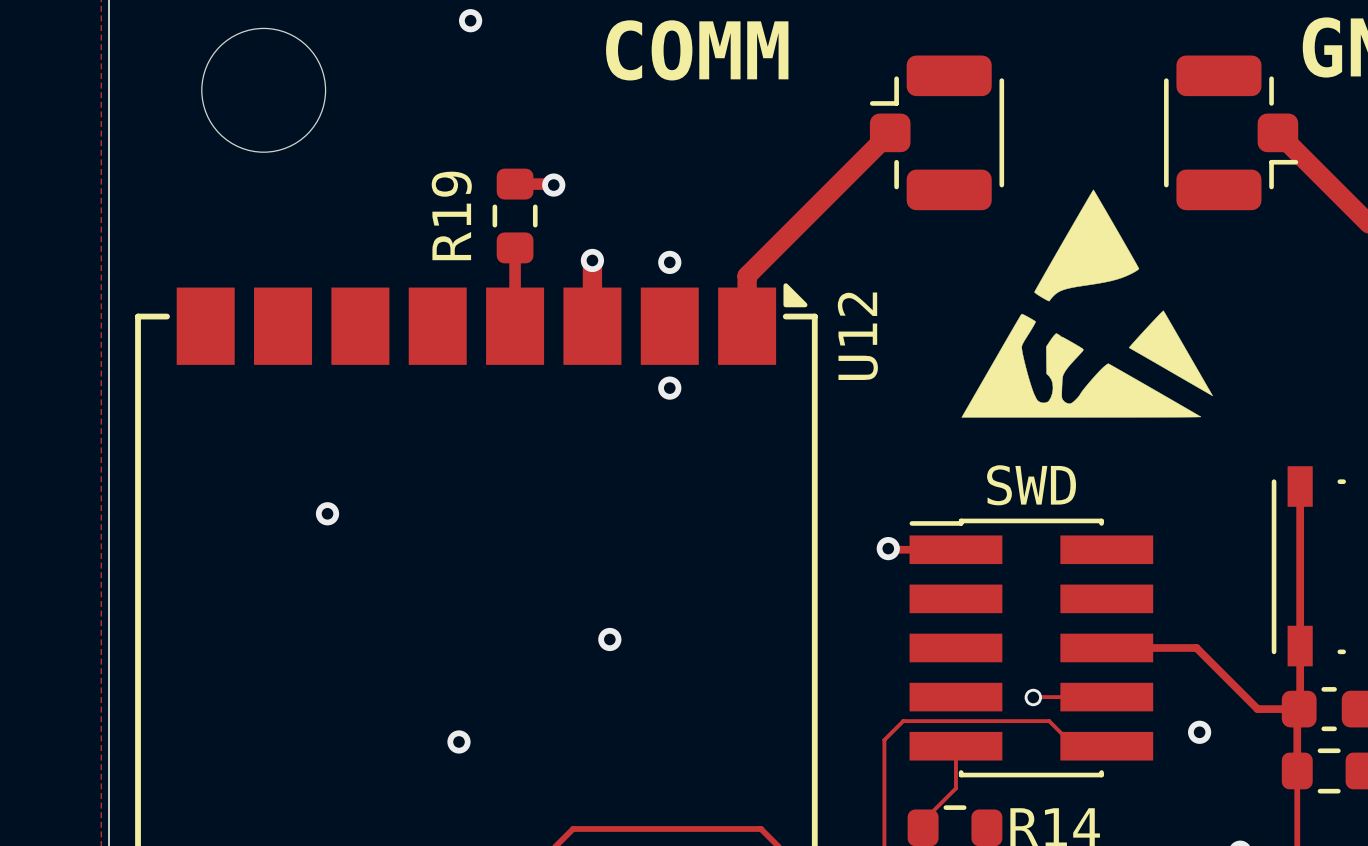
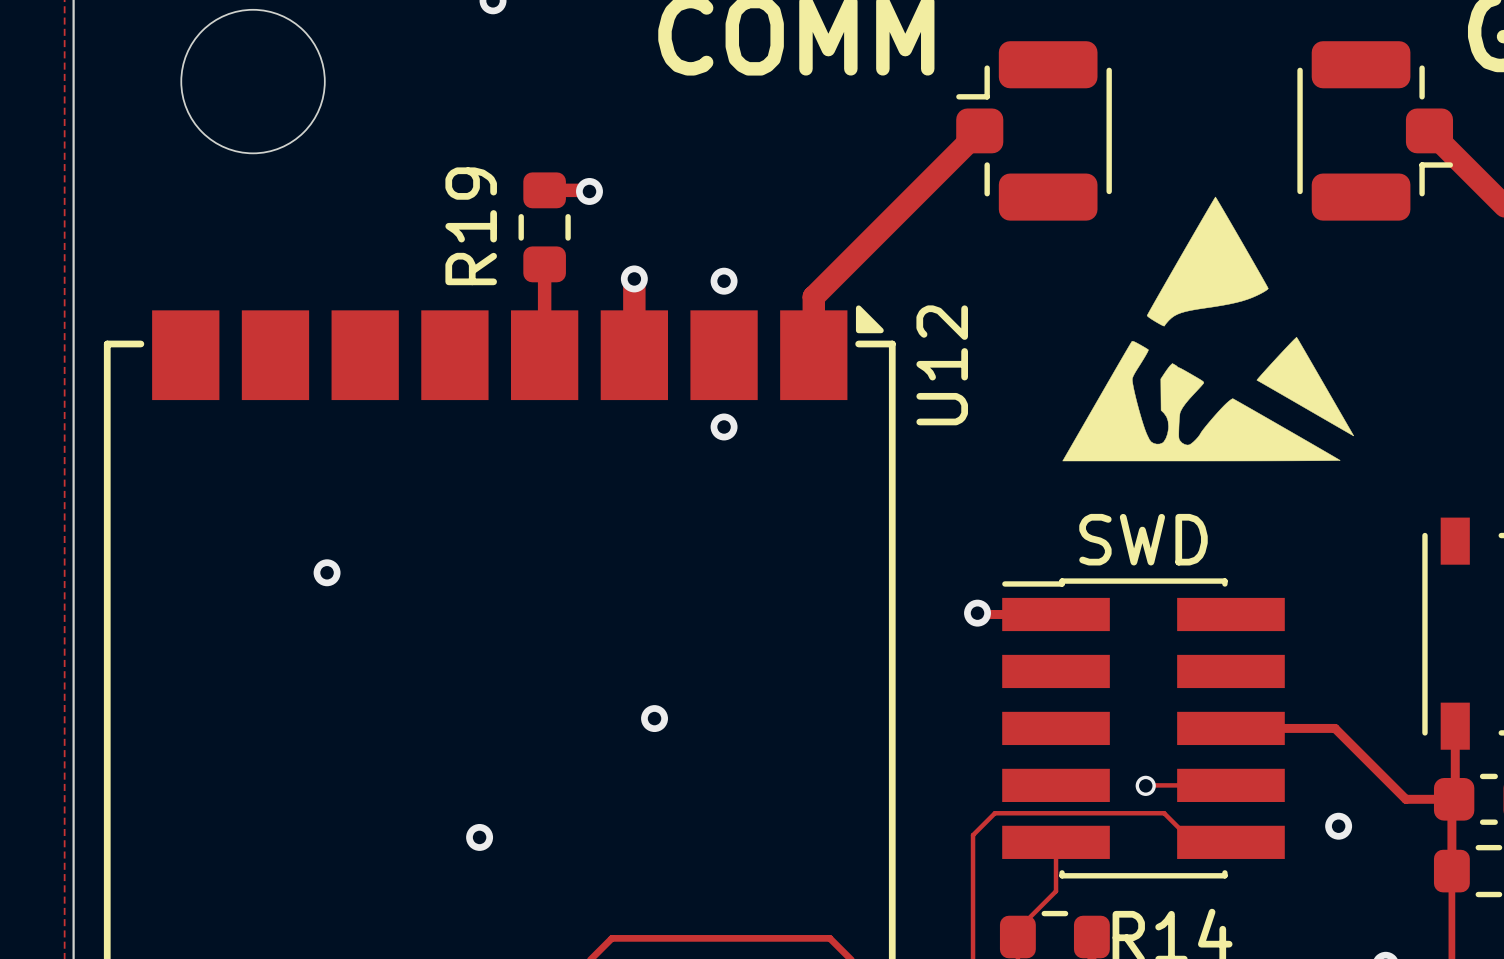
track: (1300, 486) (1300, 646) -> none

